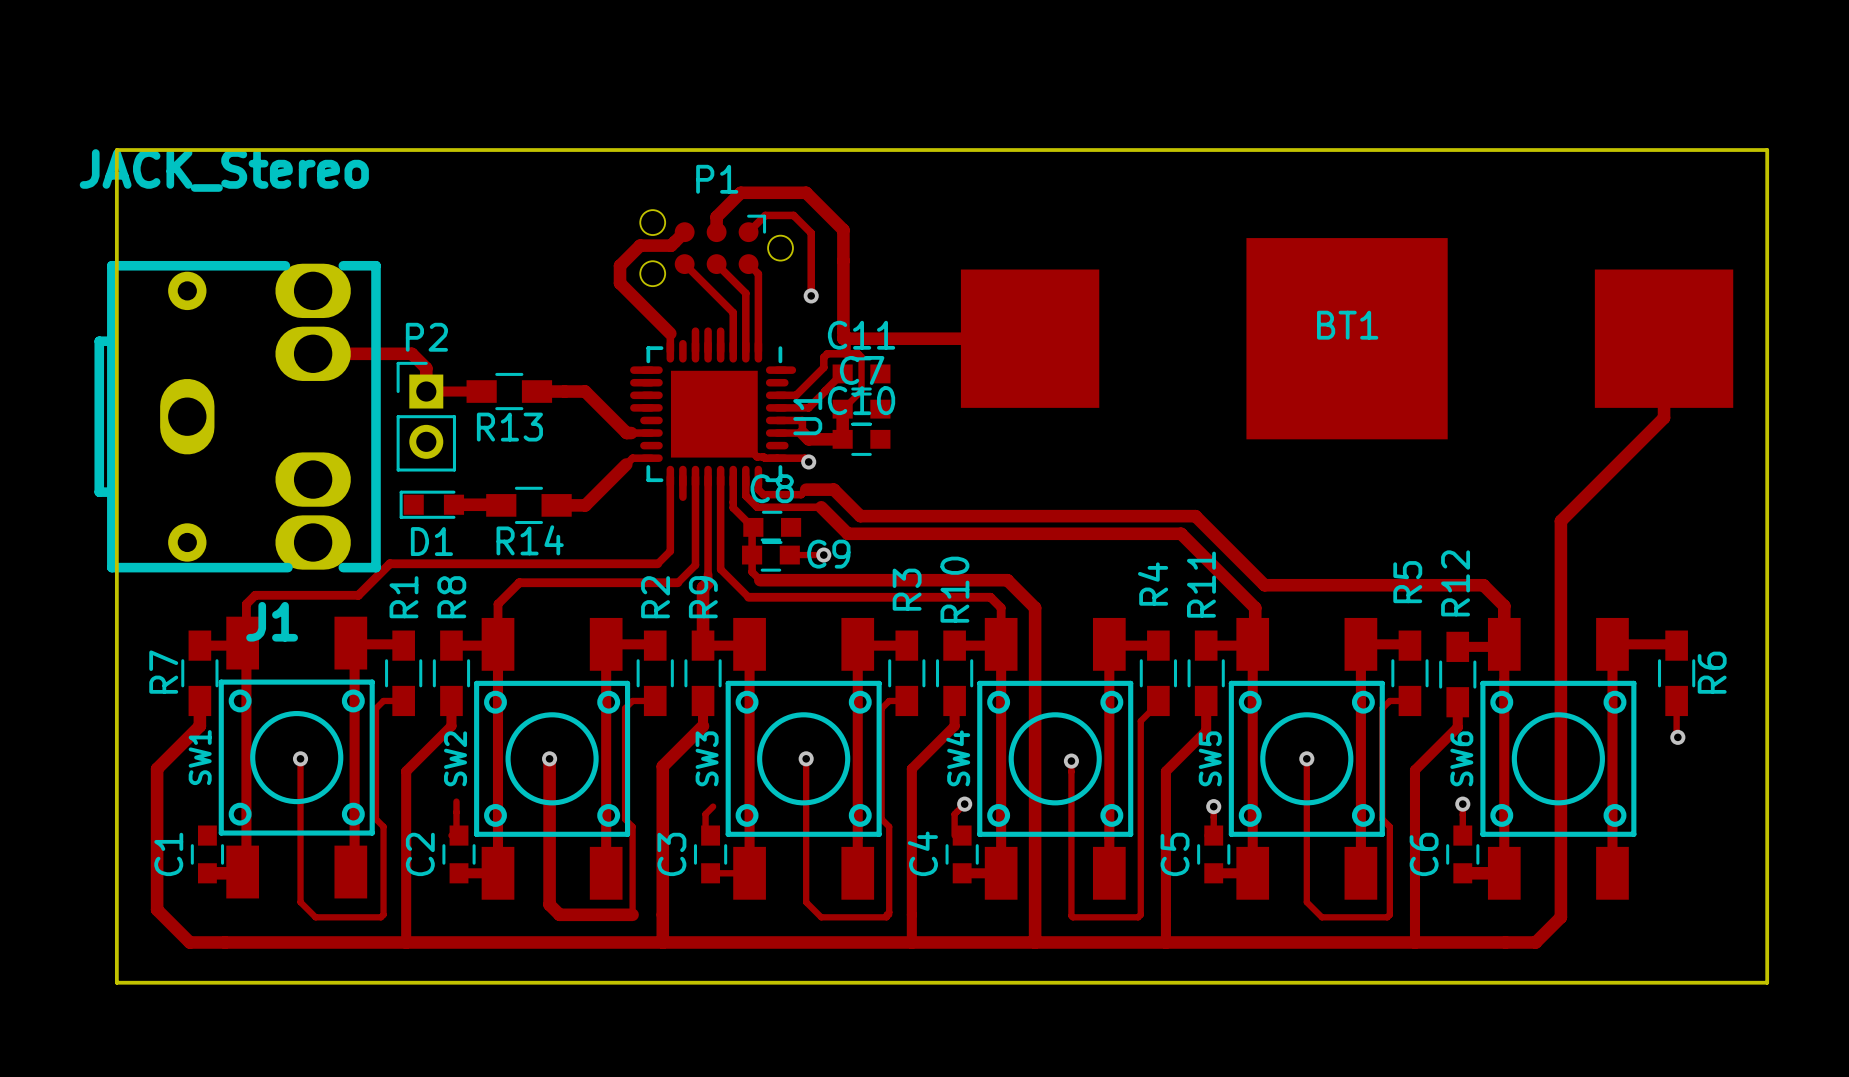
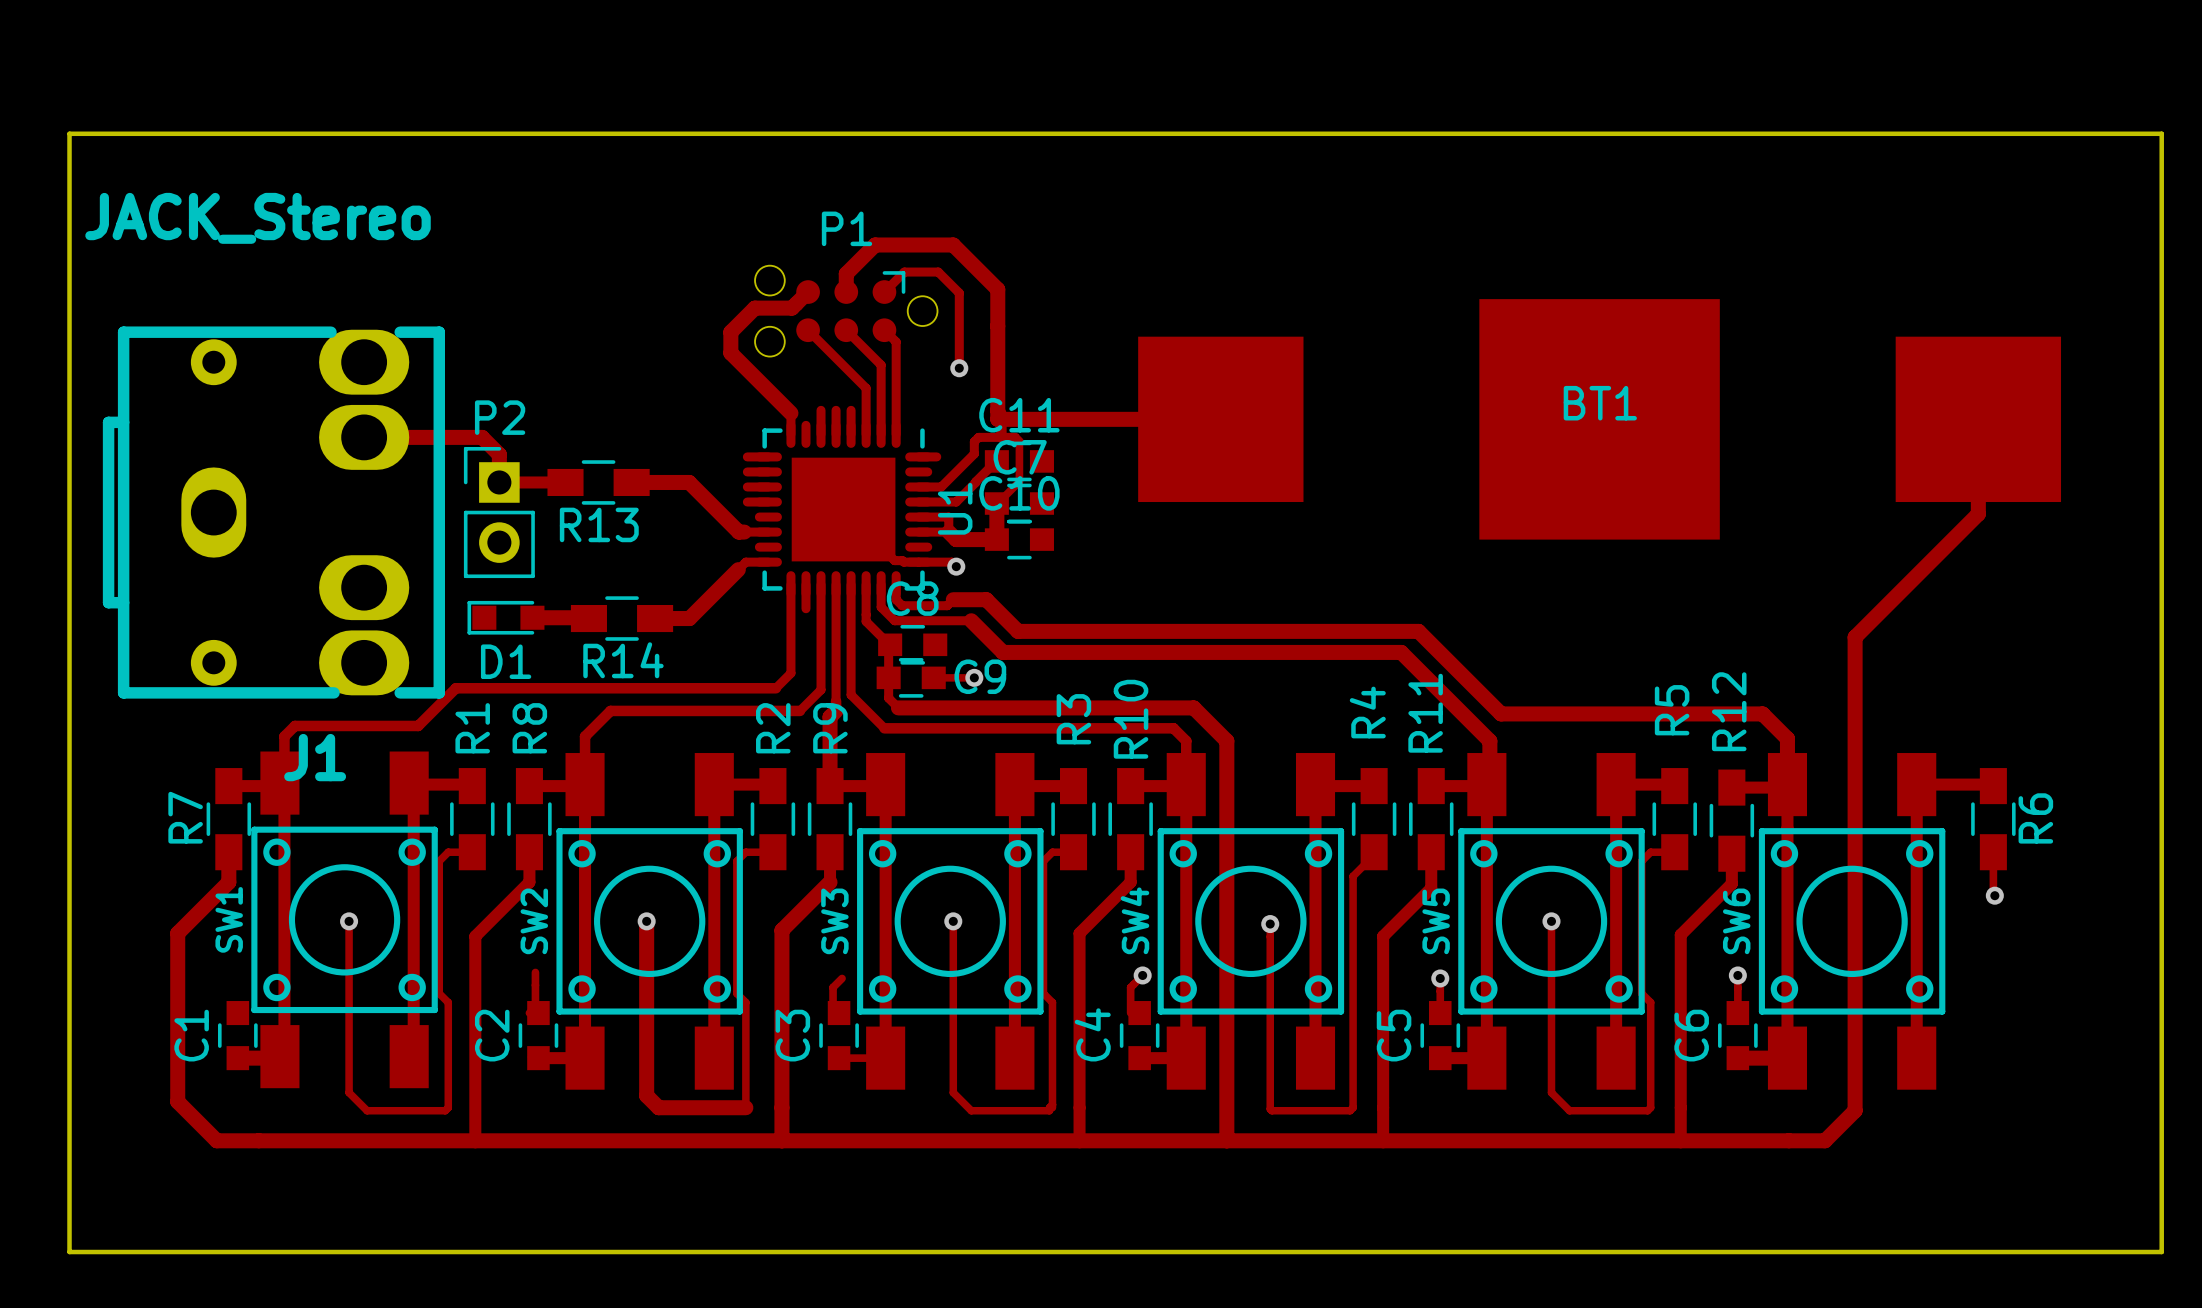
board edge: (116, 150) (116, 982) (1767, 982) (1767, 150) (116, 150) -> (69, 133) (69, 1252) (2161, 1252) (2161, 133) (69, 133)

